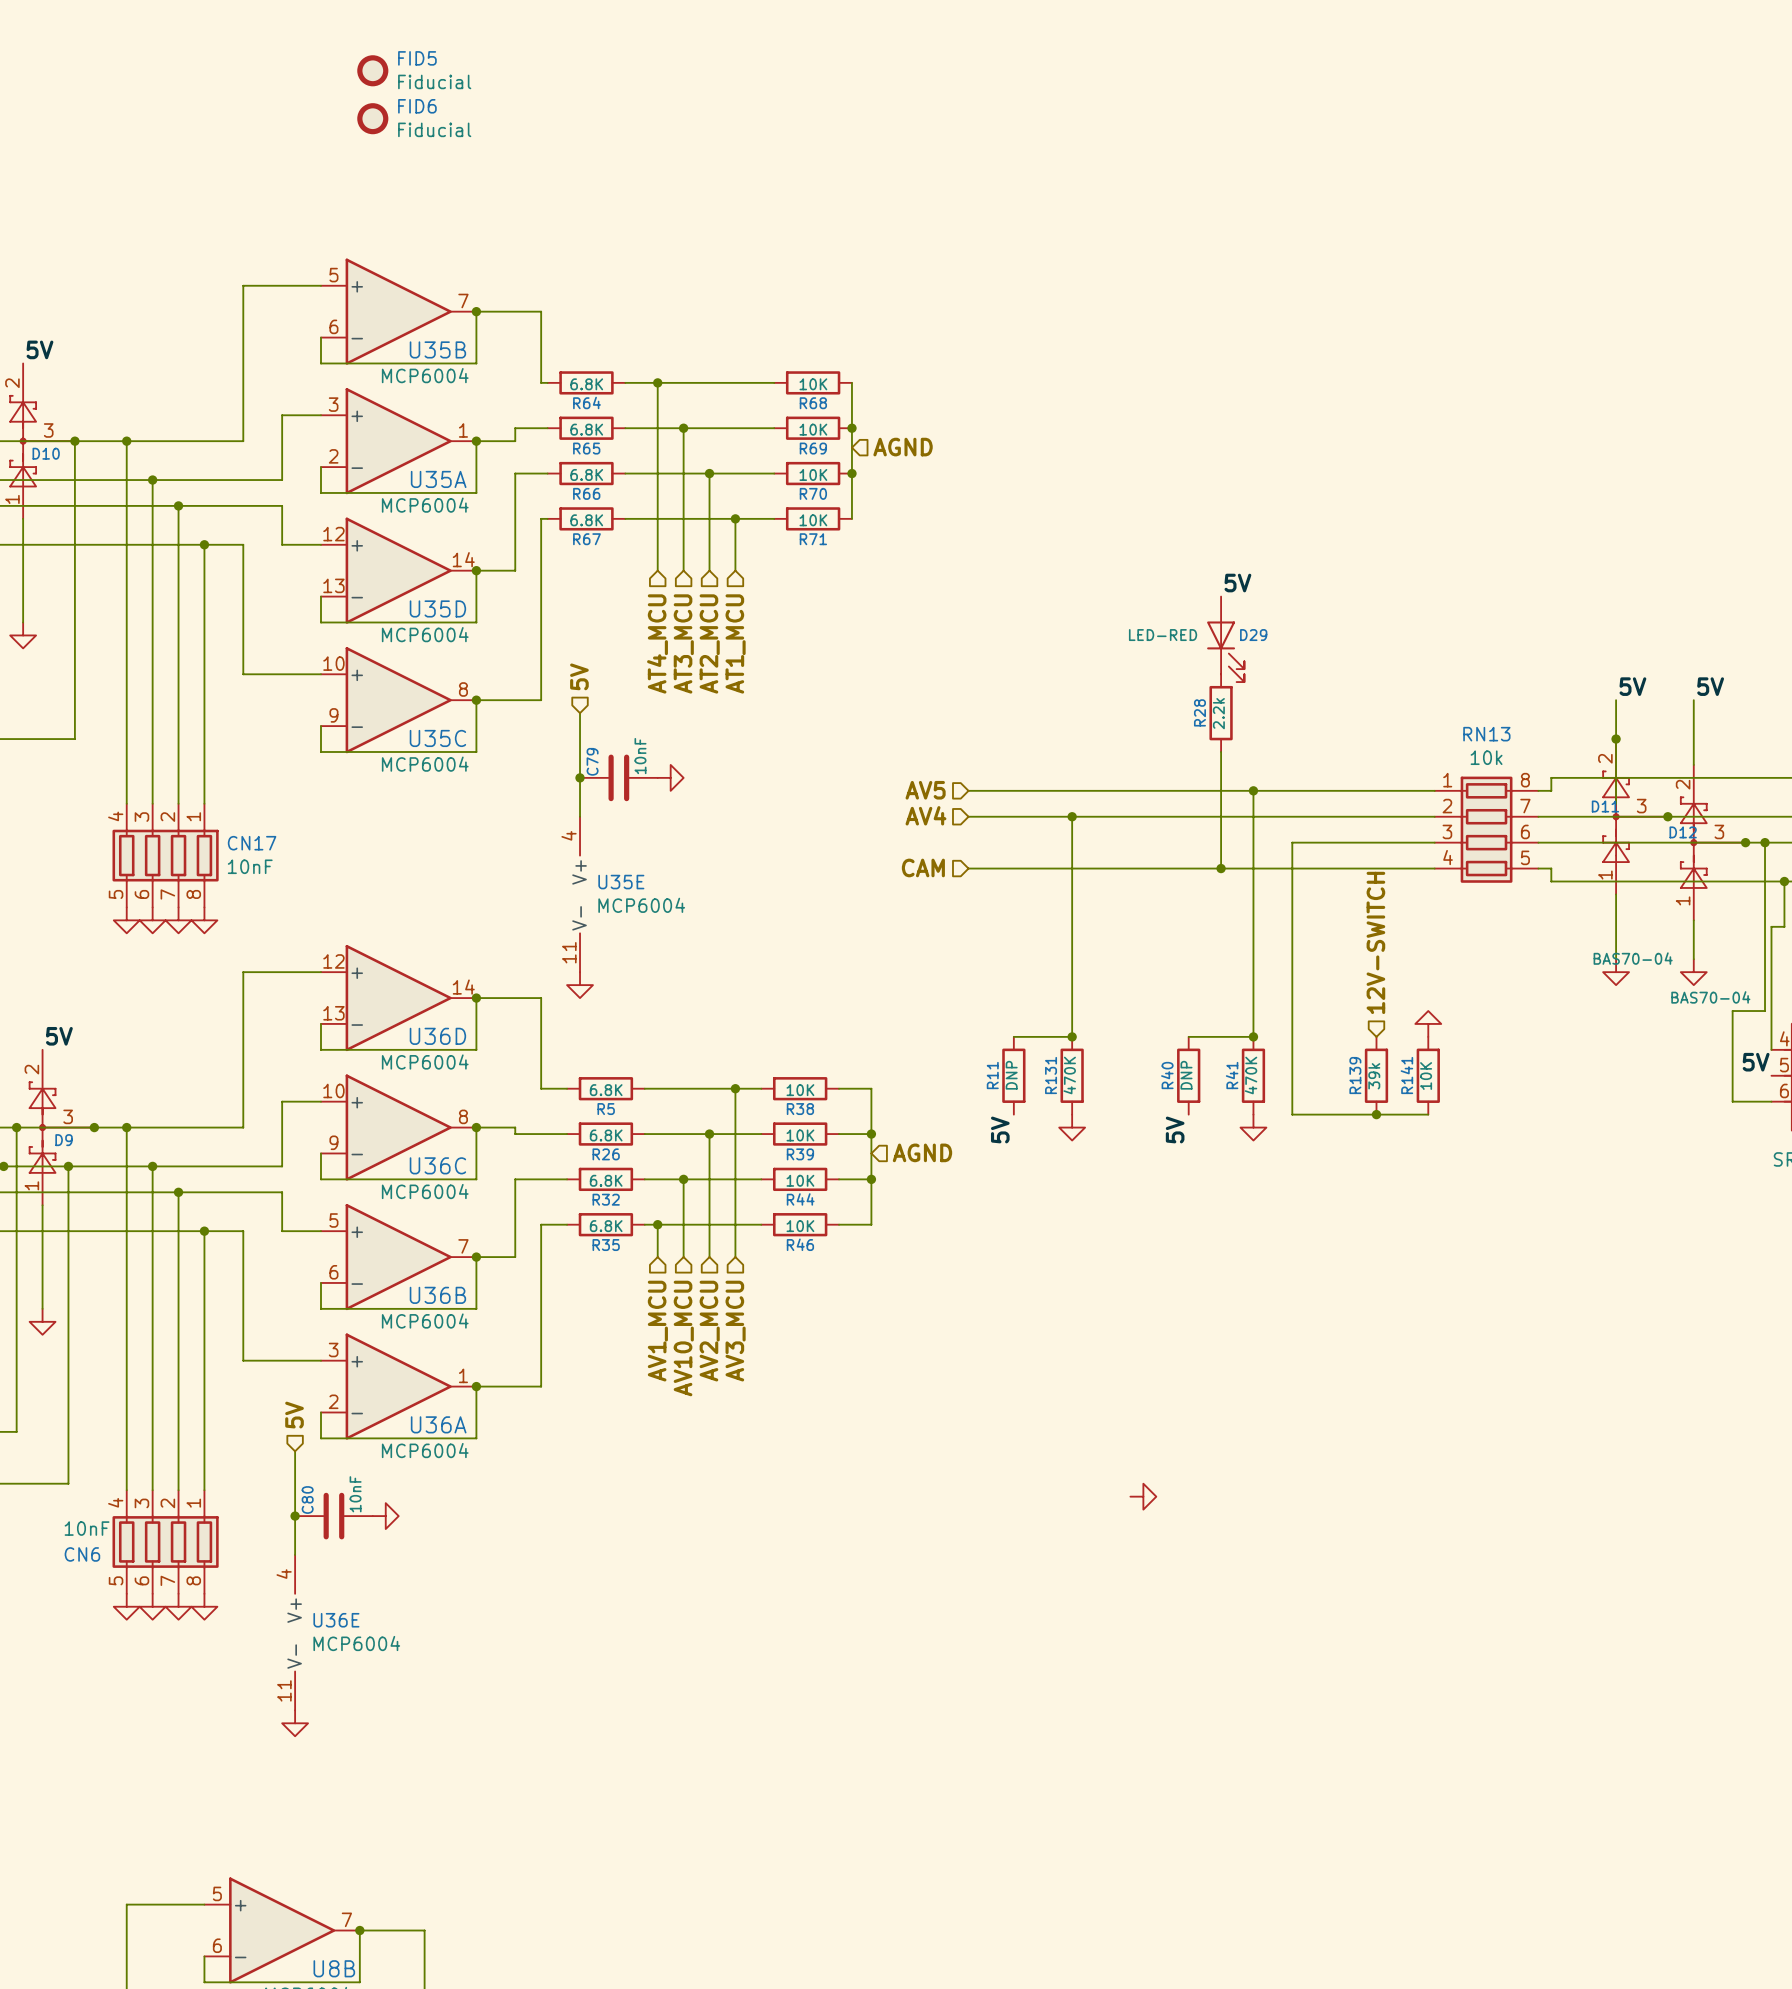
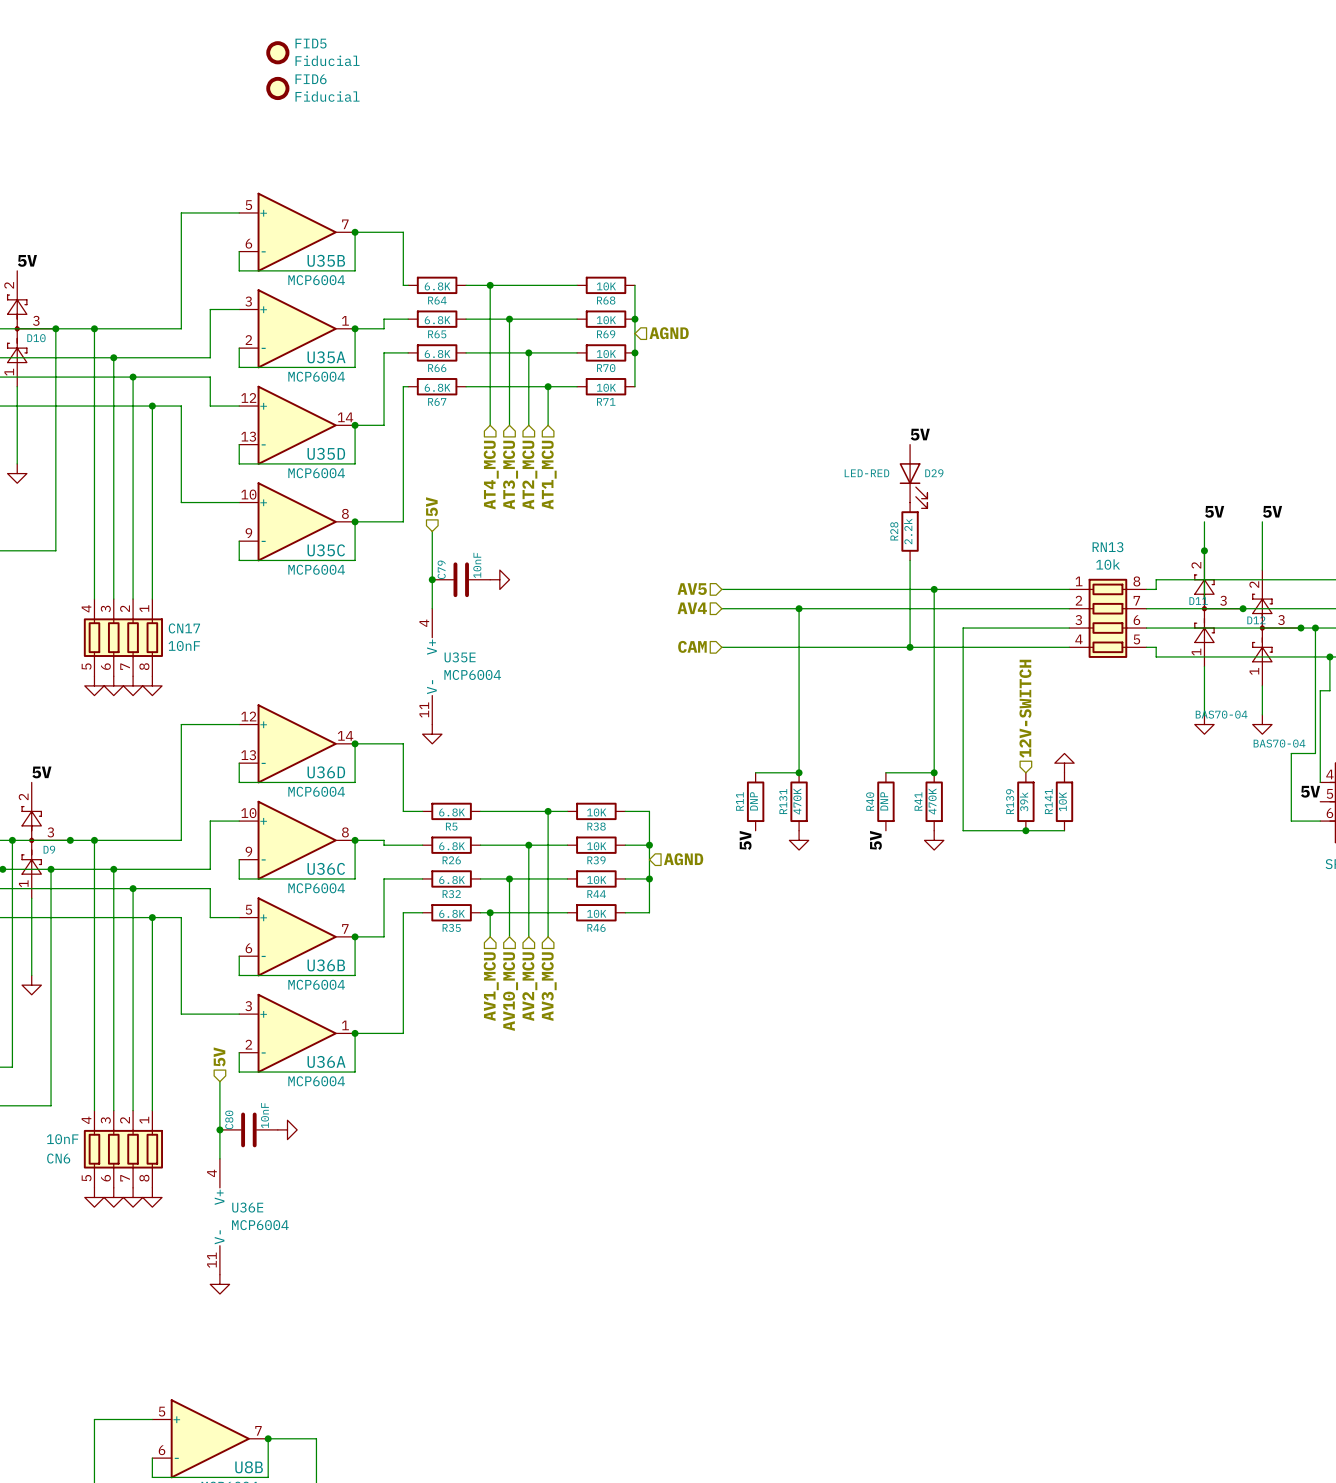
power symbol: (1143, 1496) -> none

